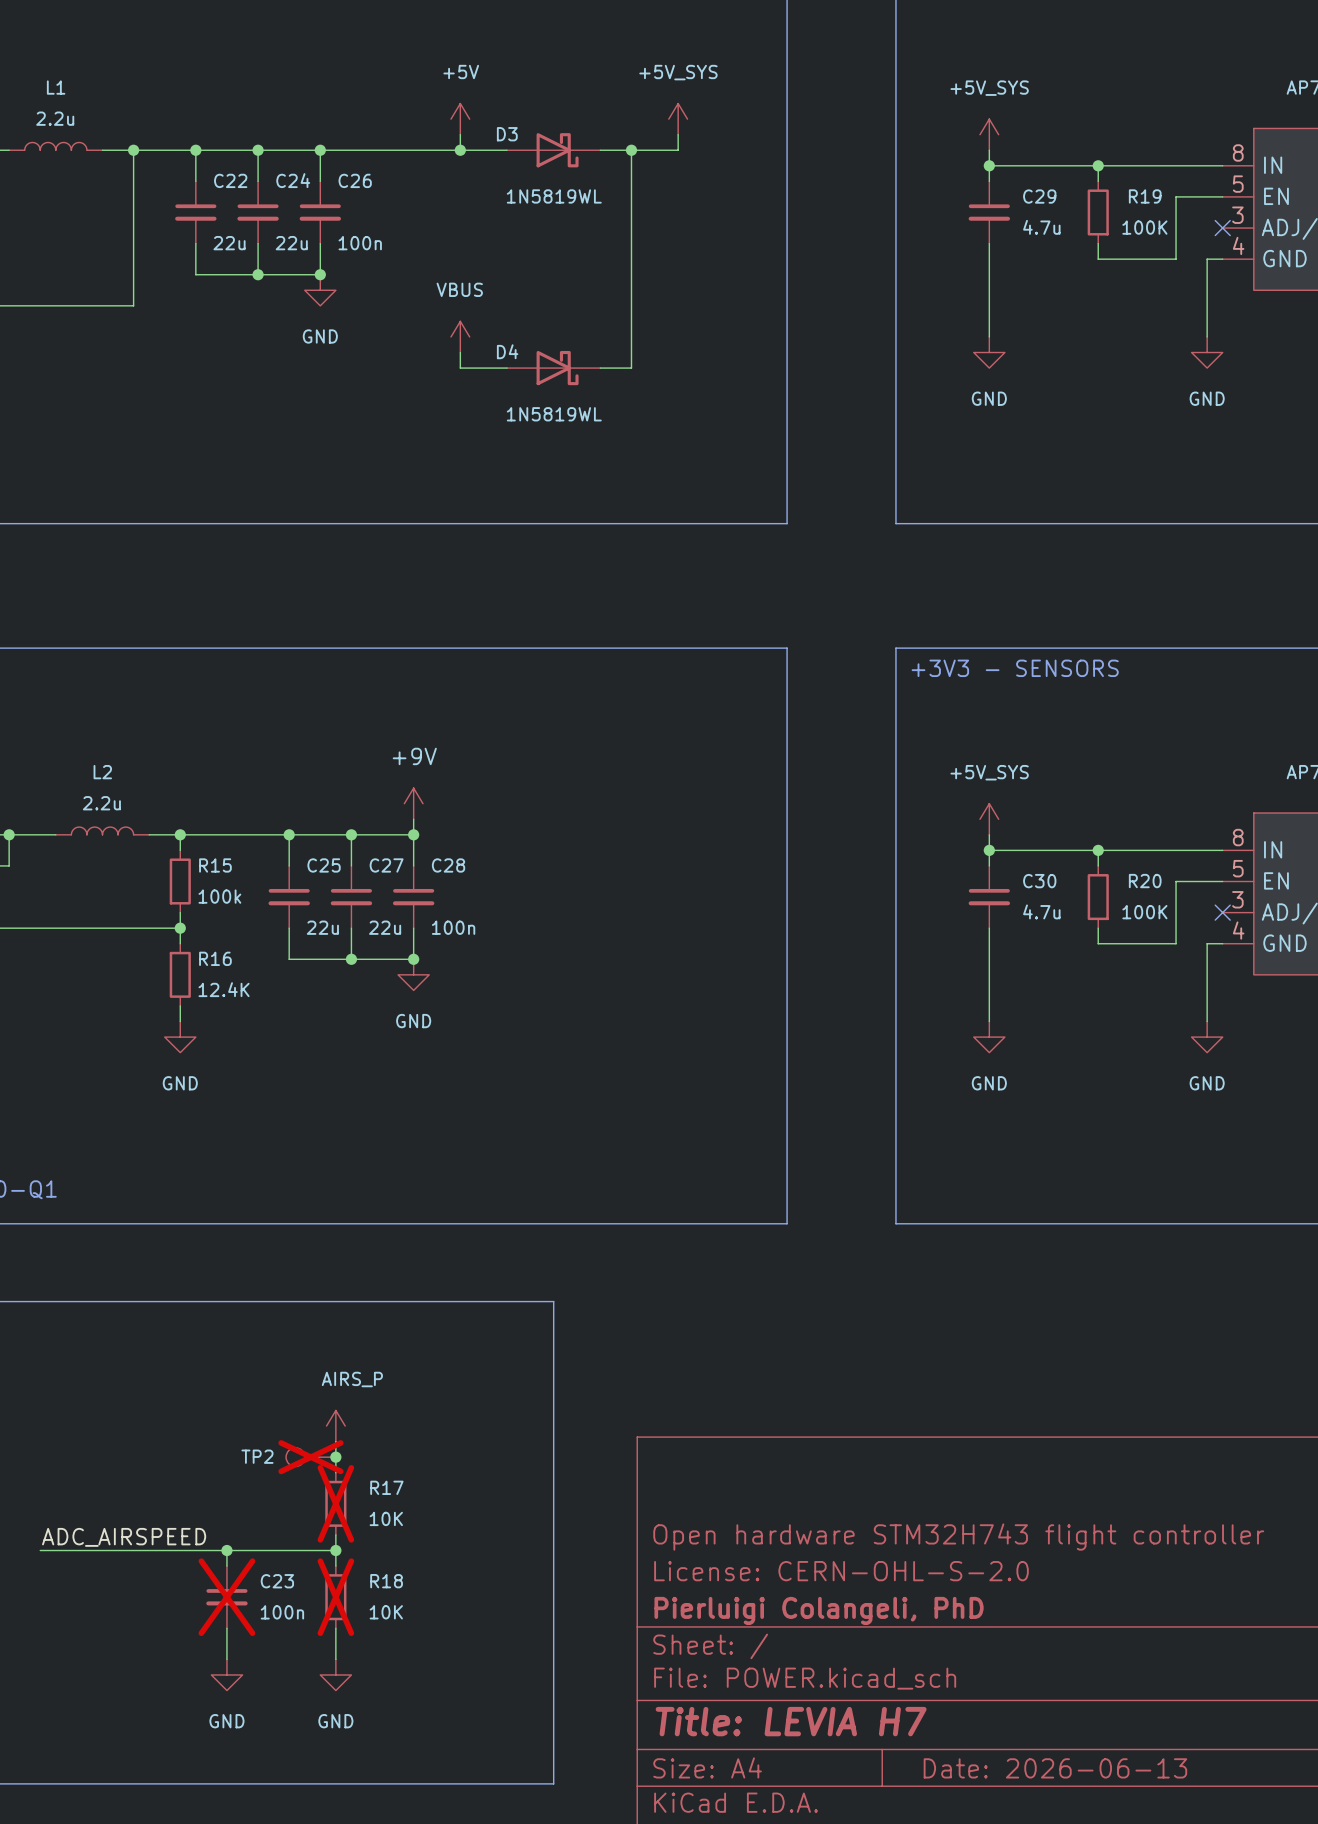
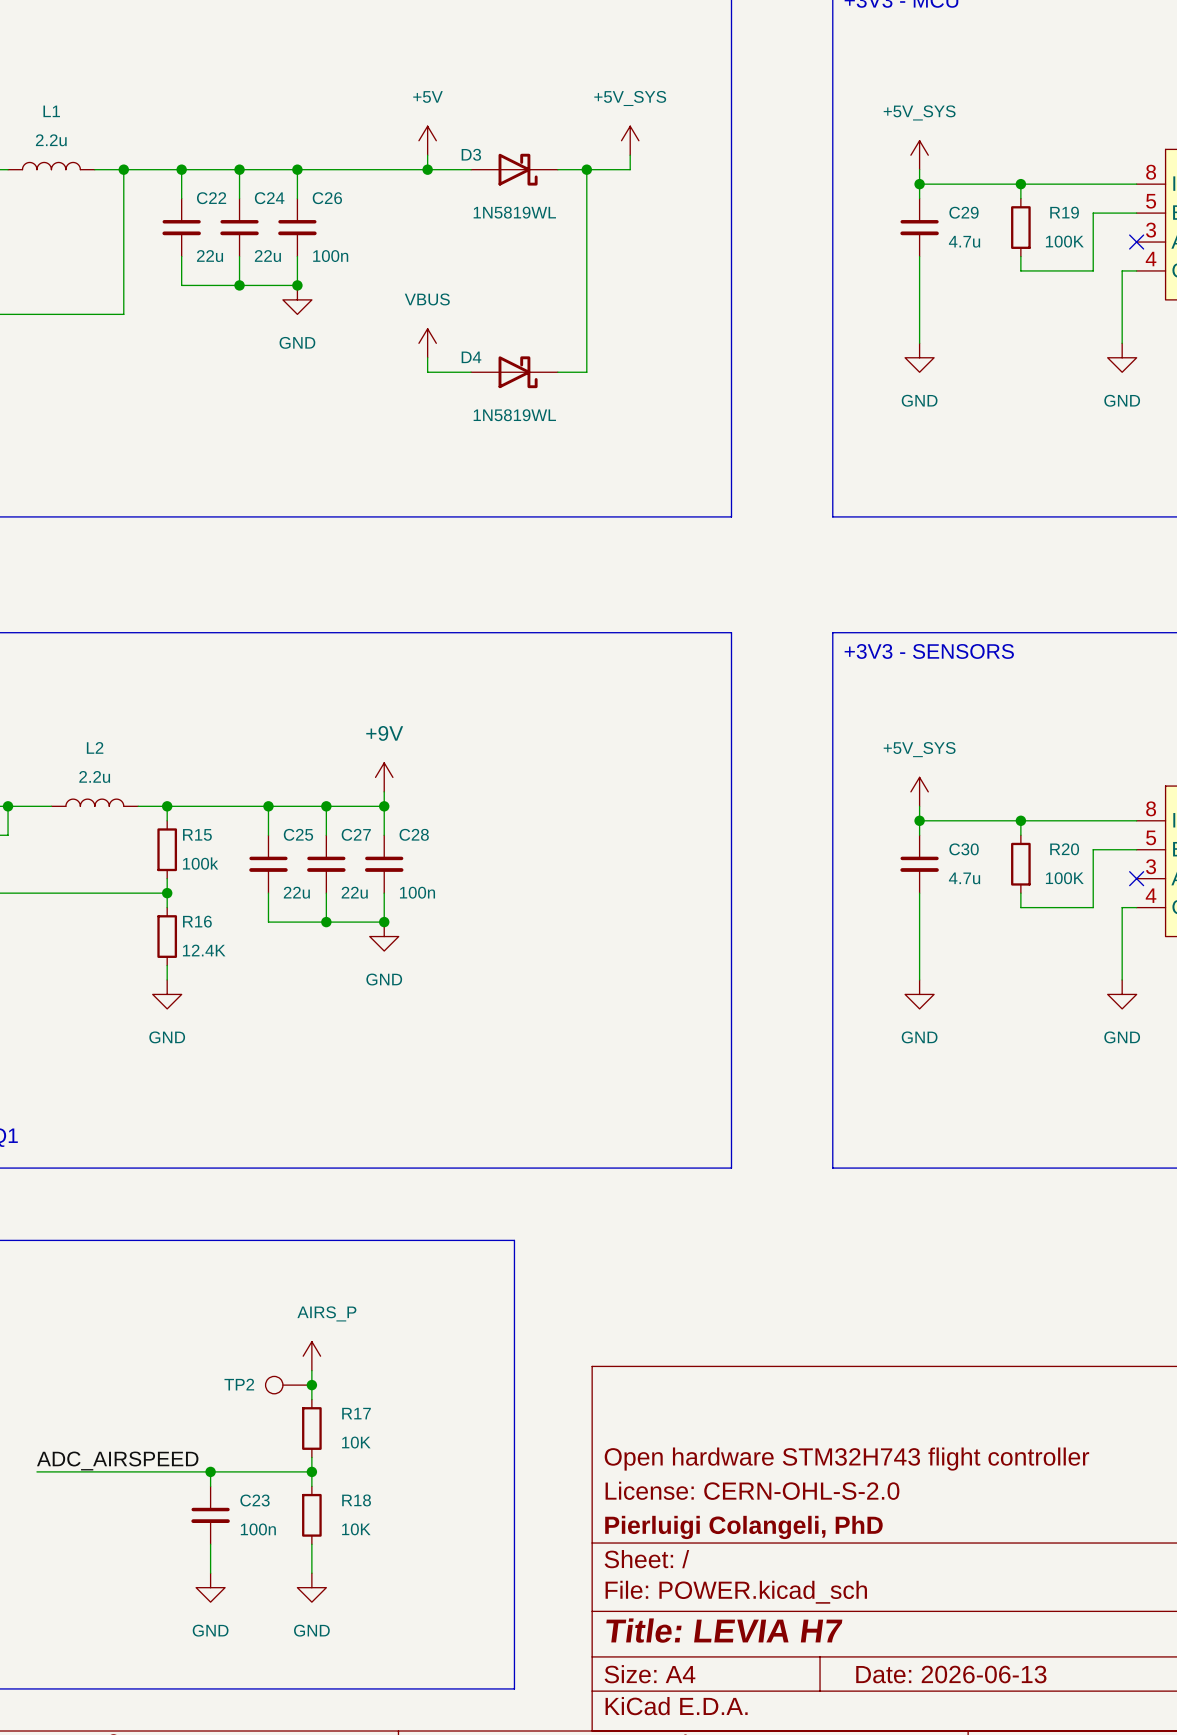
TP2 do-not-place cross: (310, 1457) -> none
R17 do-not-place cross: (335, 1503) -> none
C23 do-not-place cross: (226, 1597) -> none
R18 do-not-place cross: (335, 1597) -> none

